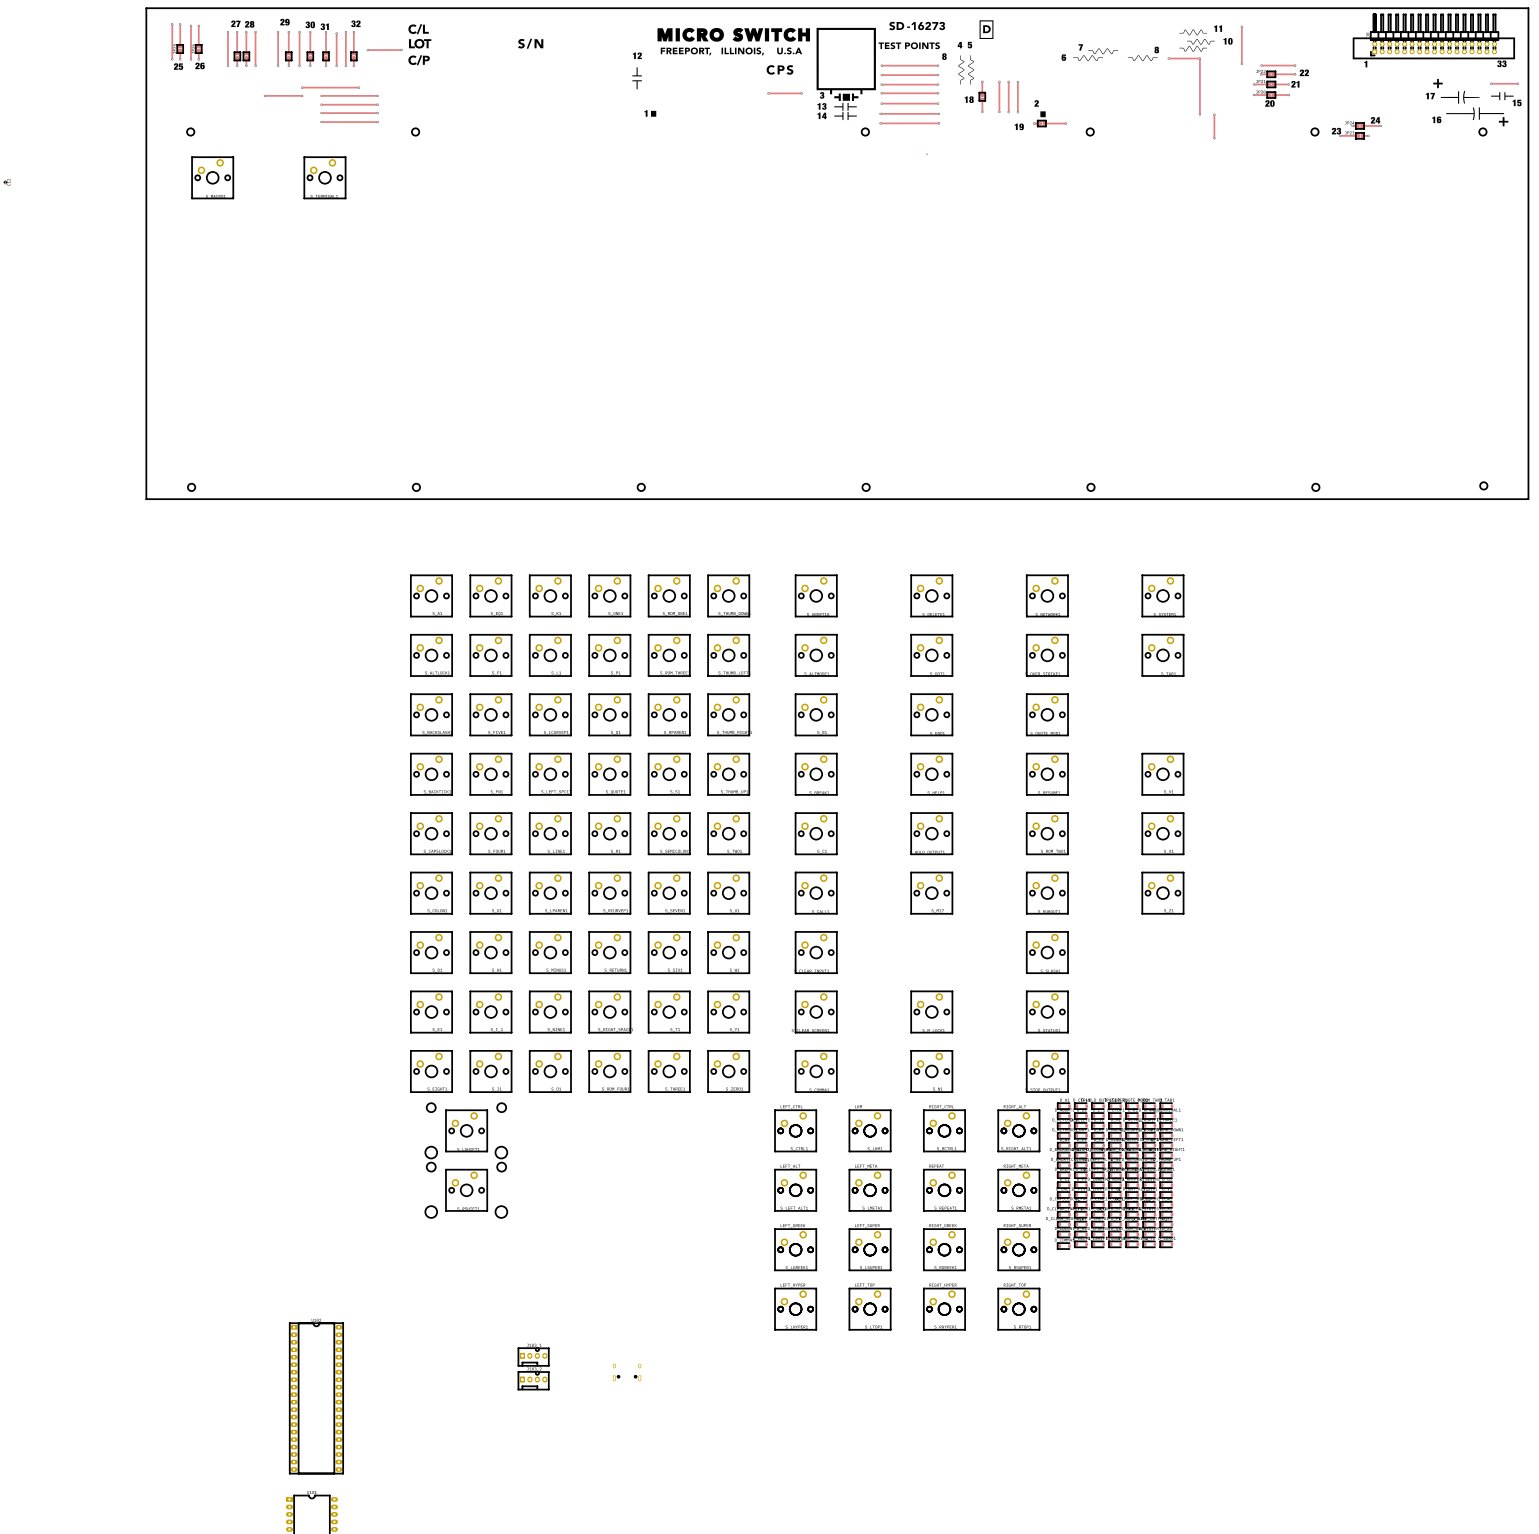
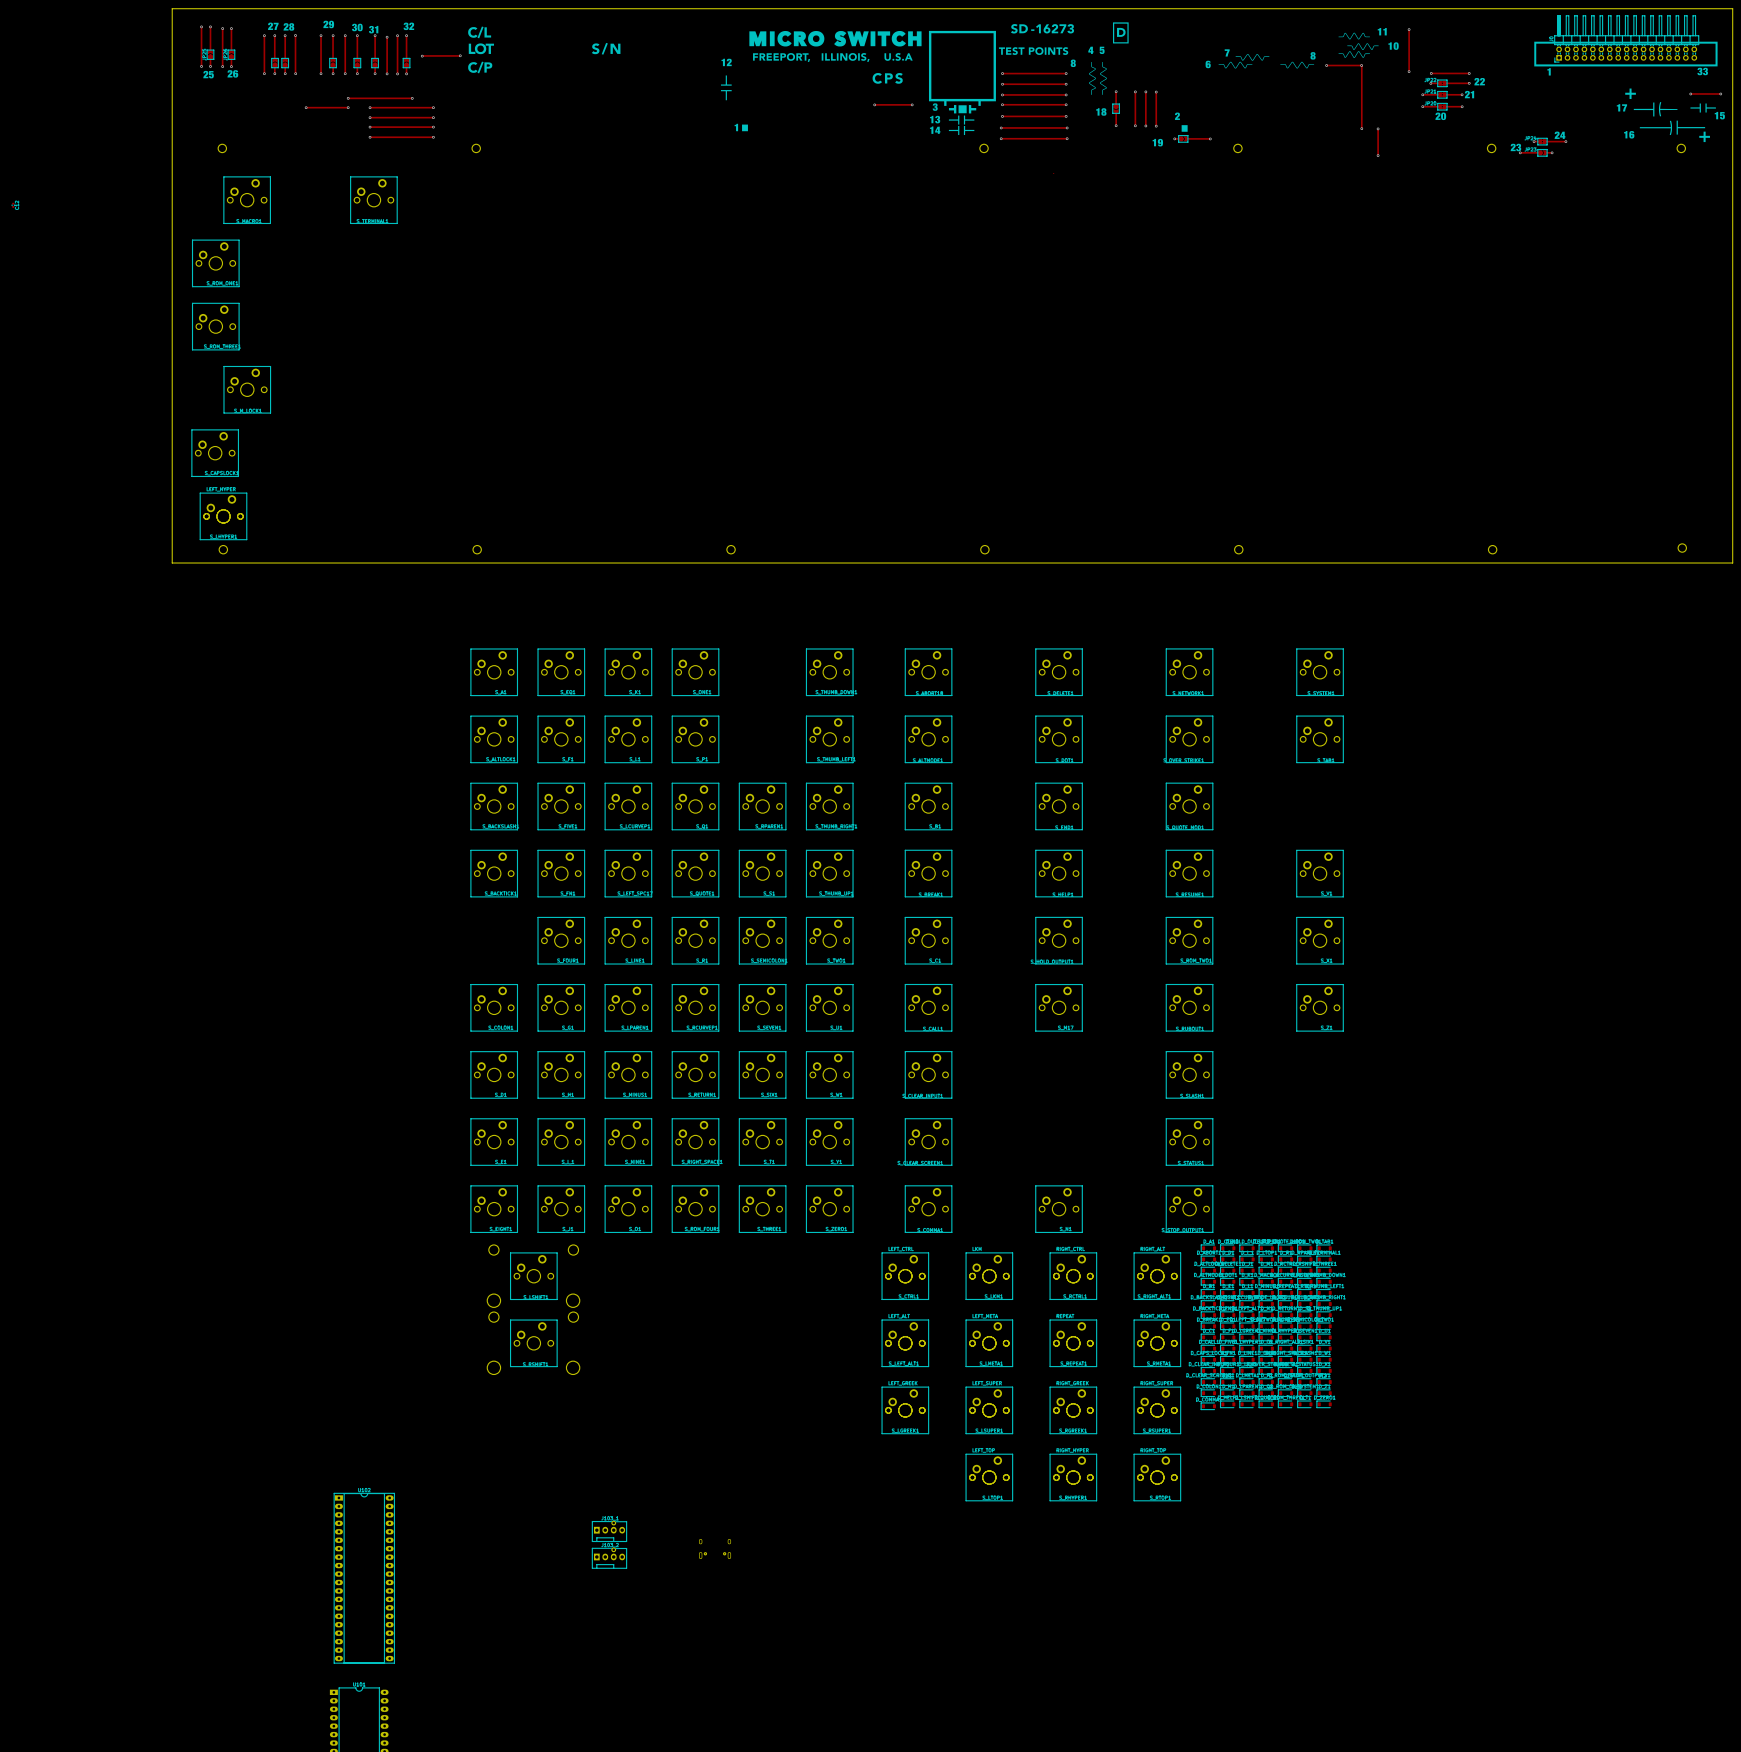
part position: (669, 595) -> (215, 263)
part position: (669, 655) -> (215, 326)
part position: (431, 833) -> (215, 453)
part position: (931, 1012) -> (247, 389)
part position: (795, 1309) -> (223, 516)

